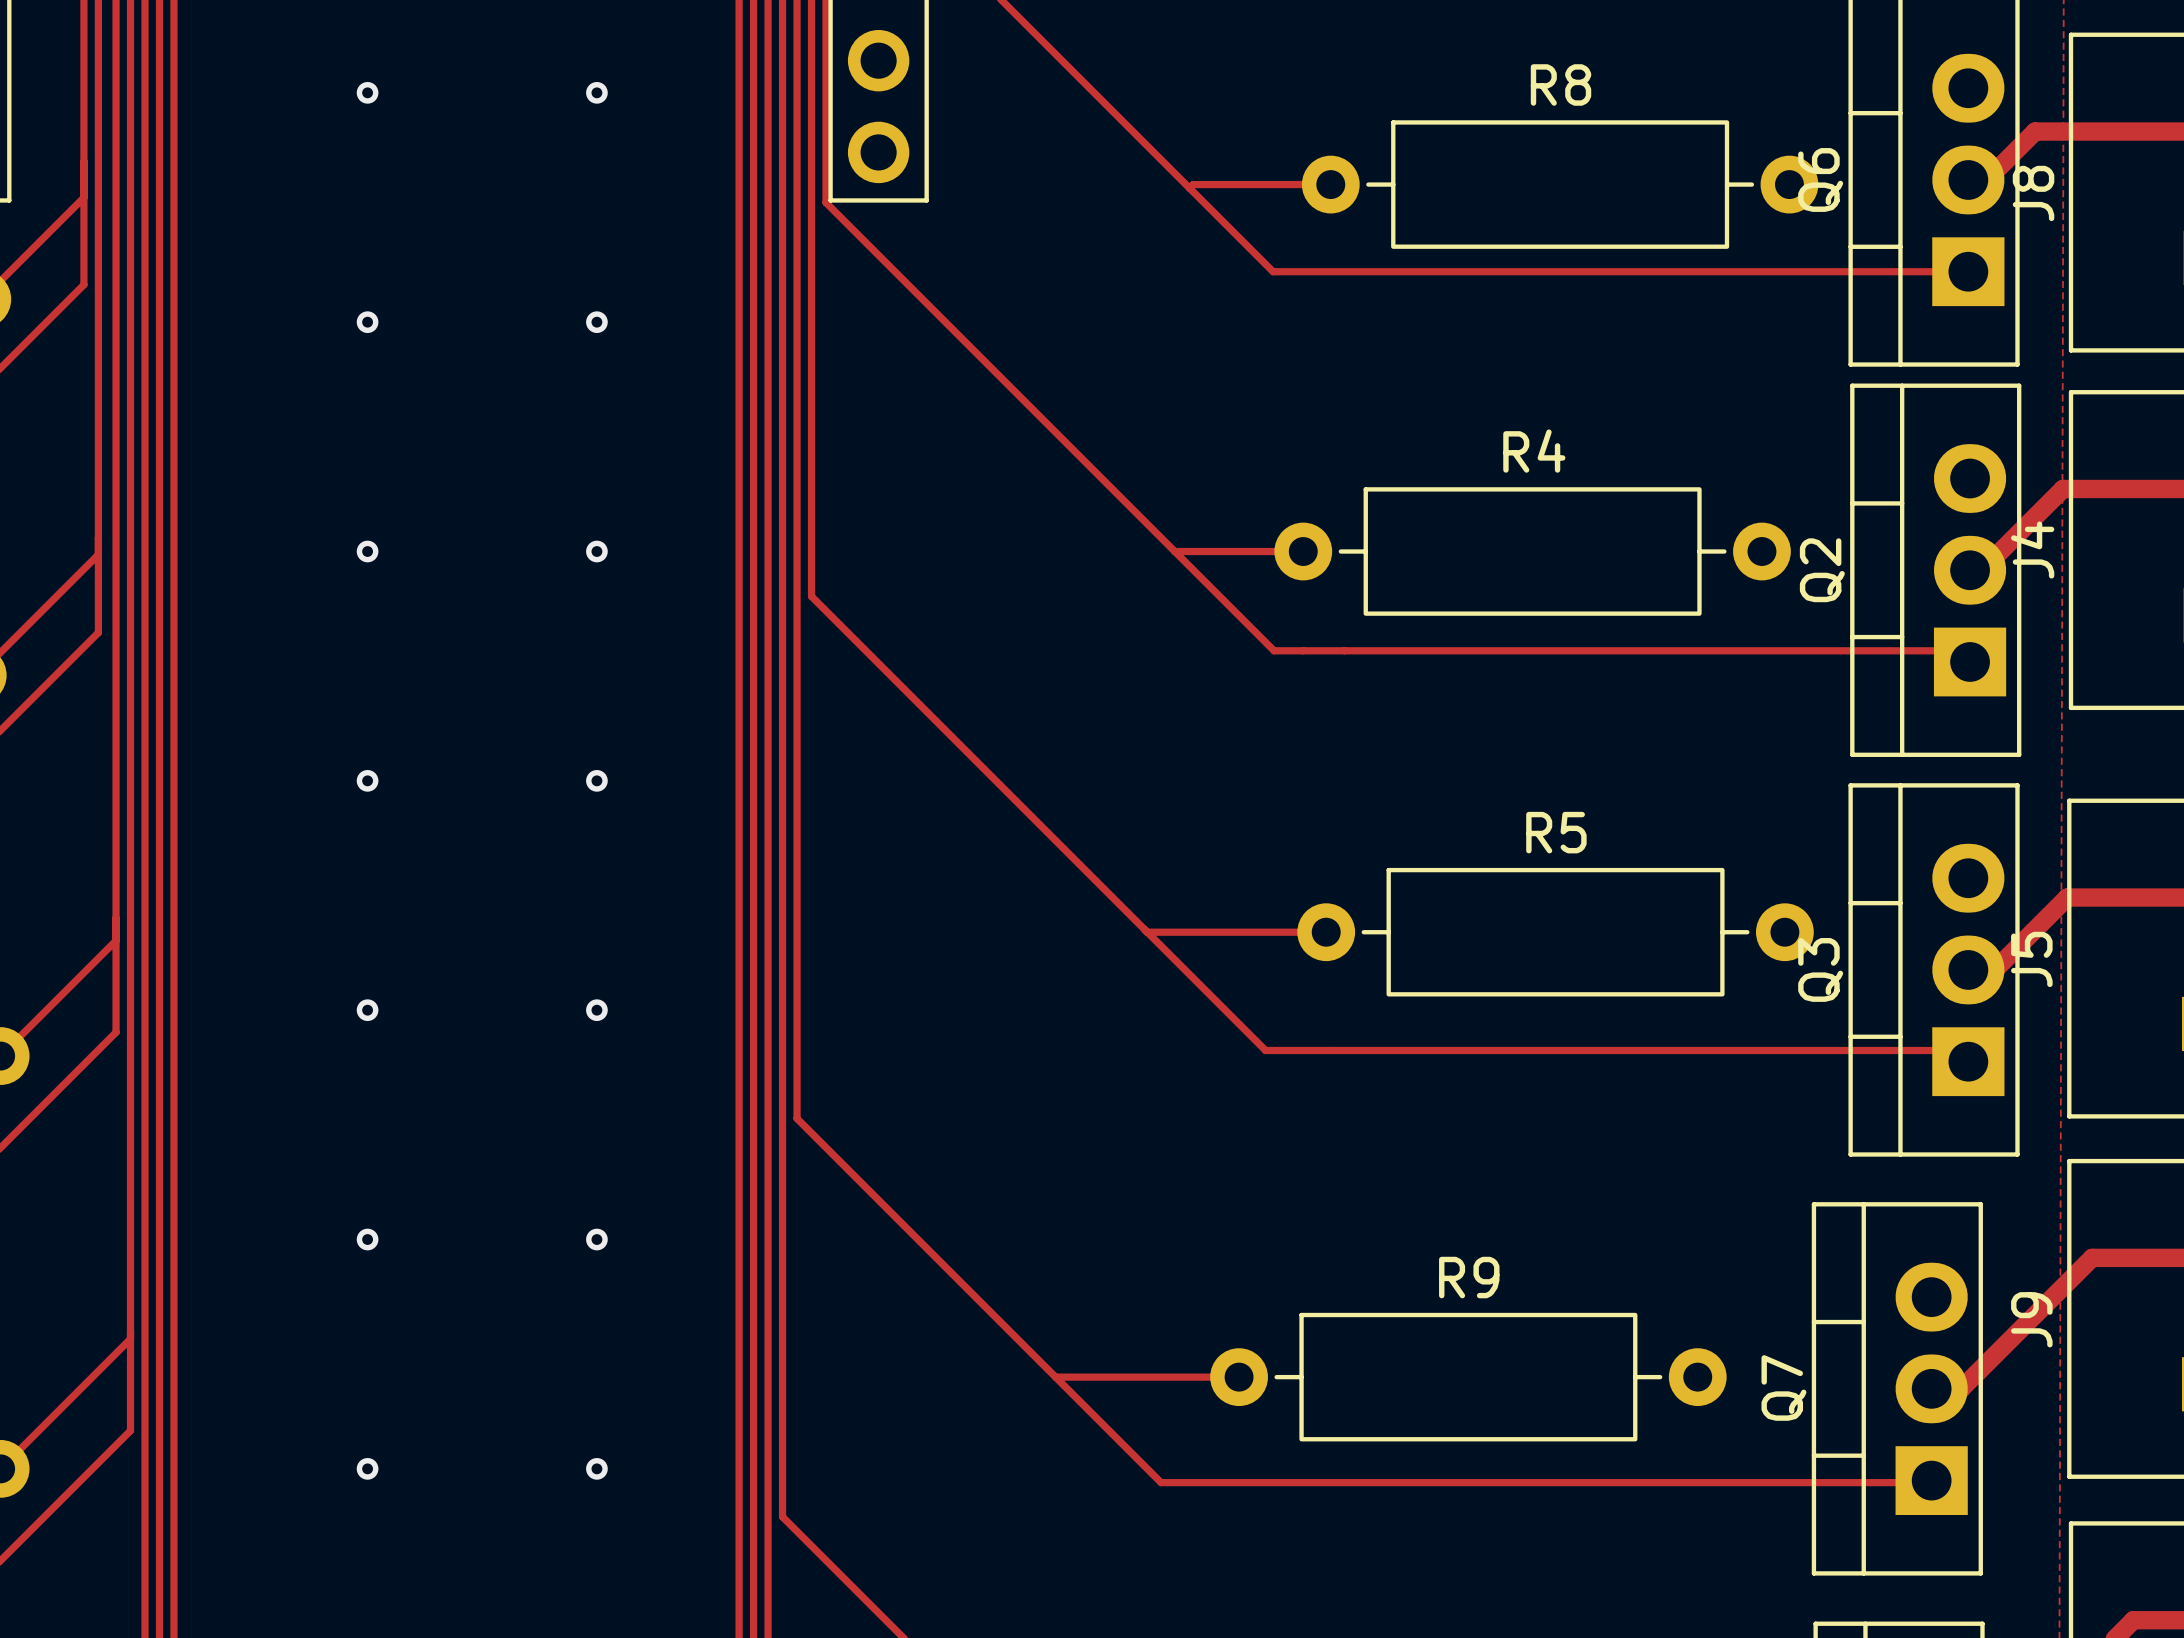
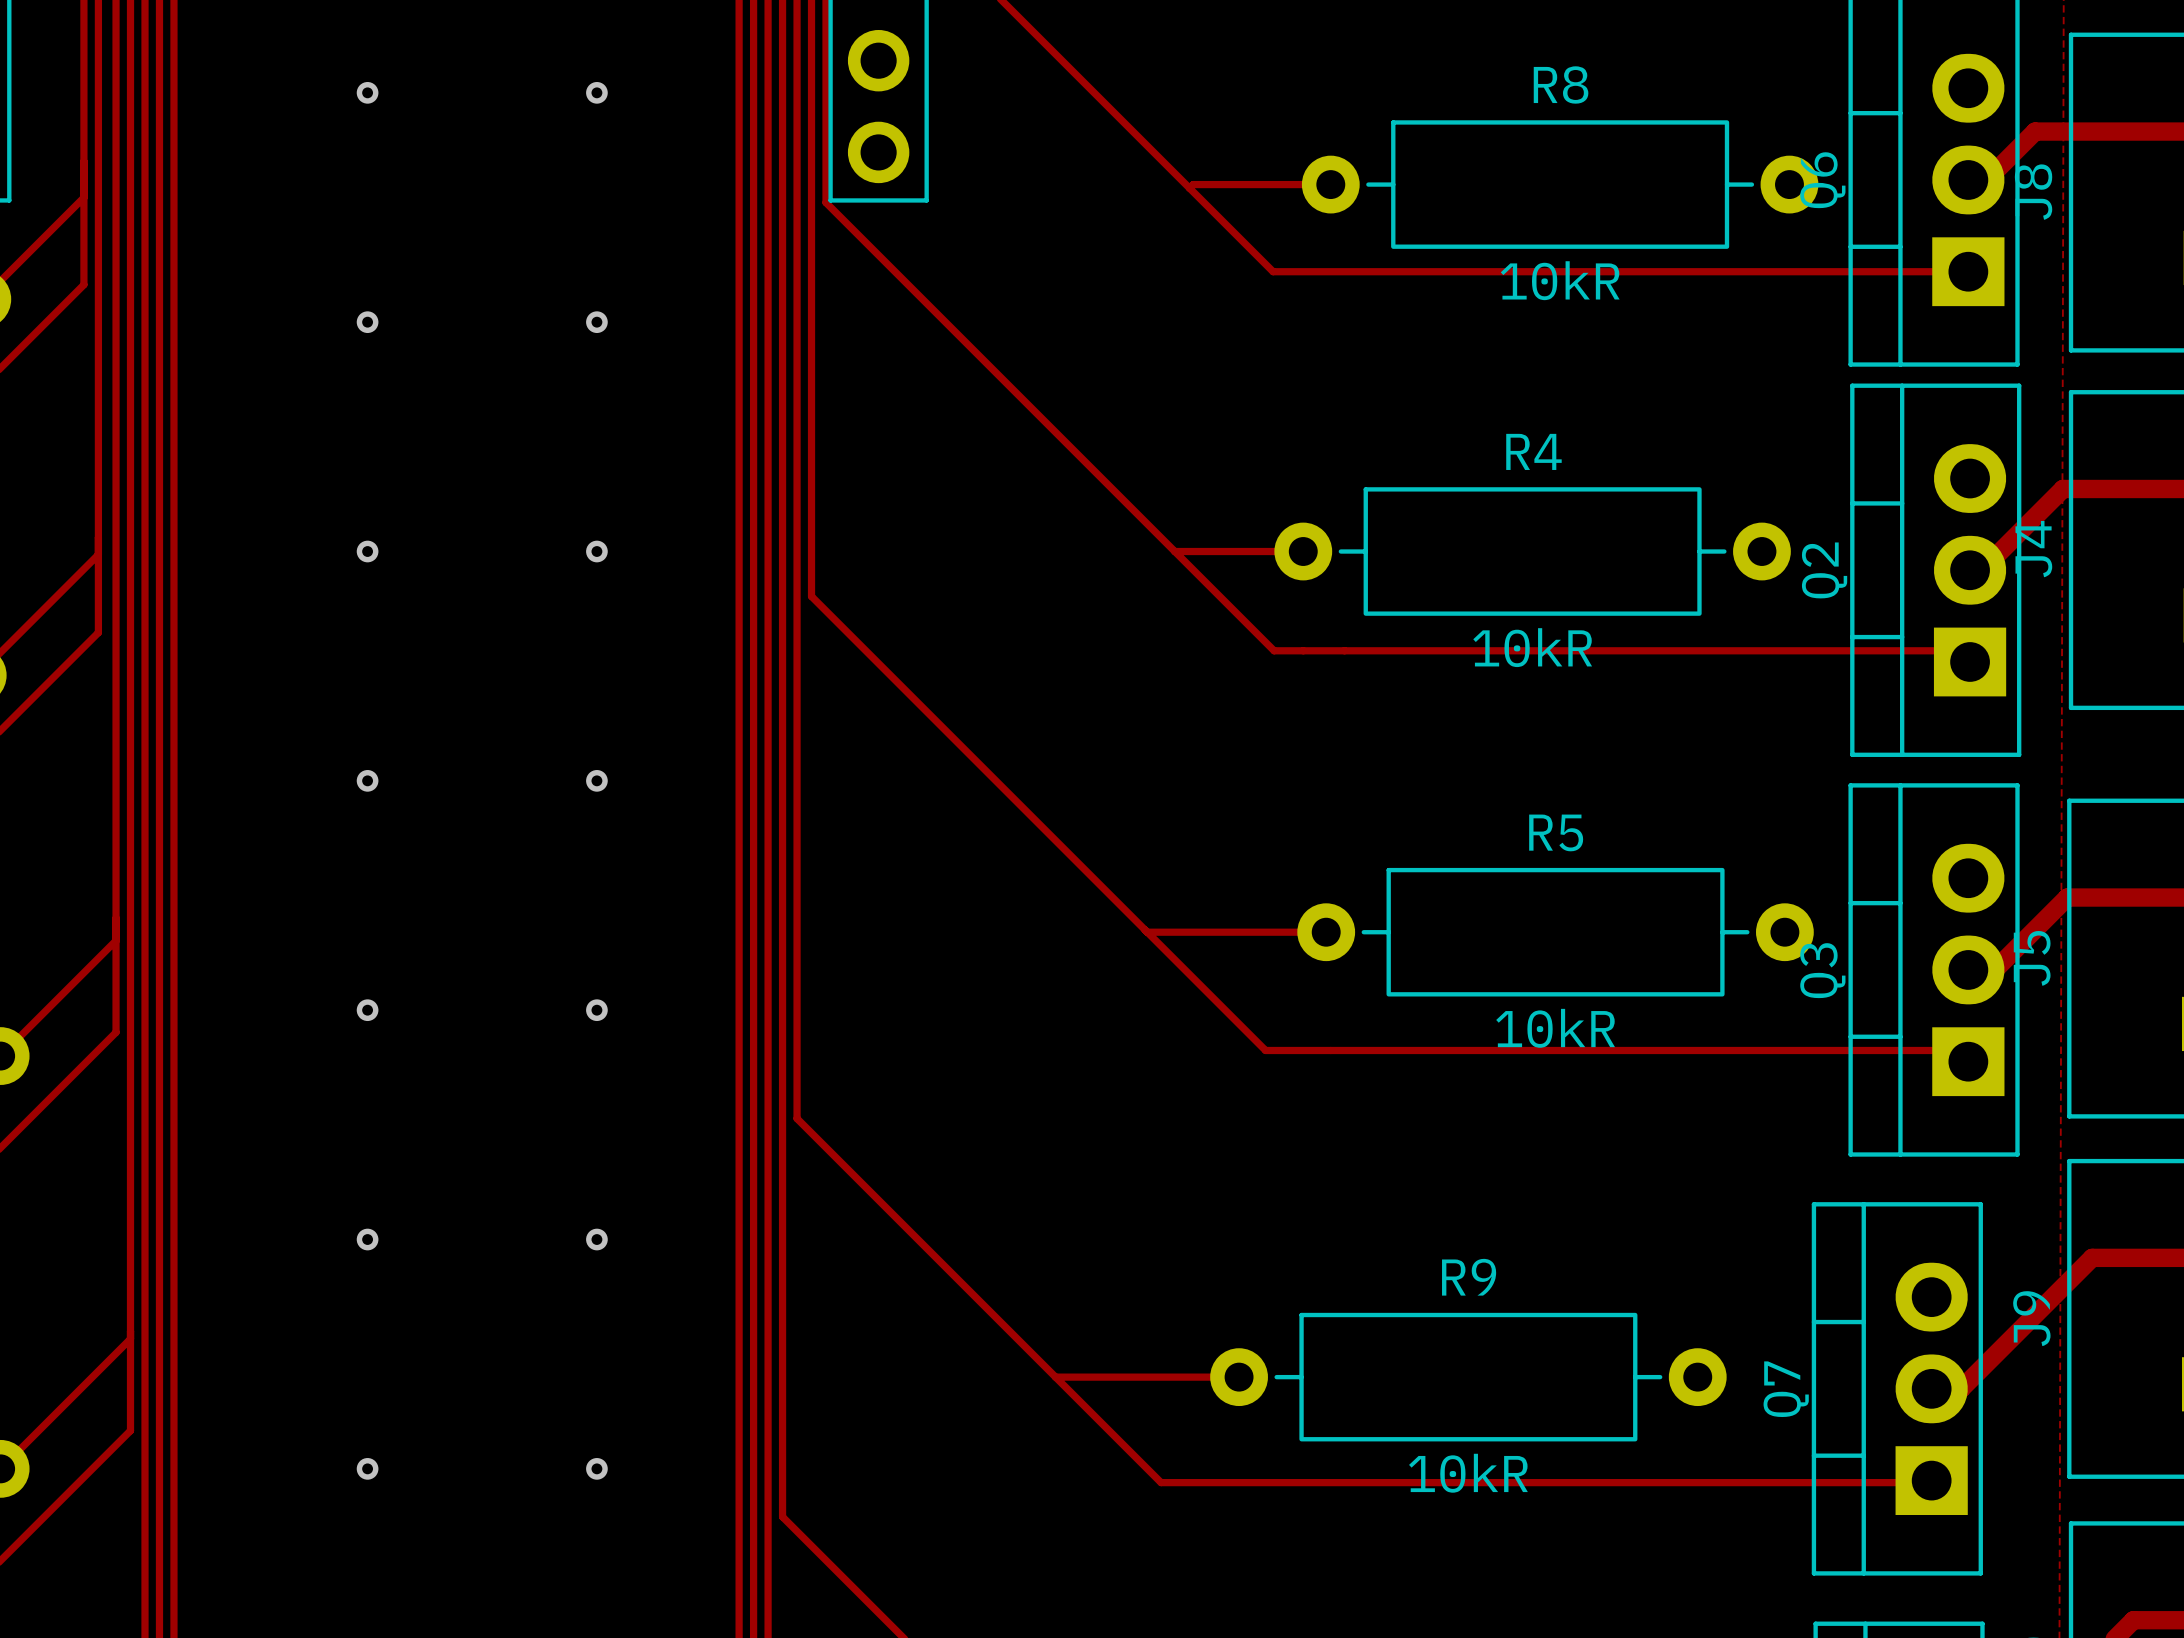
R8 value: none -> 10kR (1560, 280)
R4 value: none -> 10kR (1532, 647)
R5 value: none -> 10kR (1555, 1028)
R9 value: none -> 10kR (1468, 1473)

